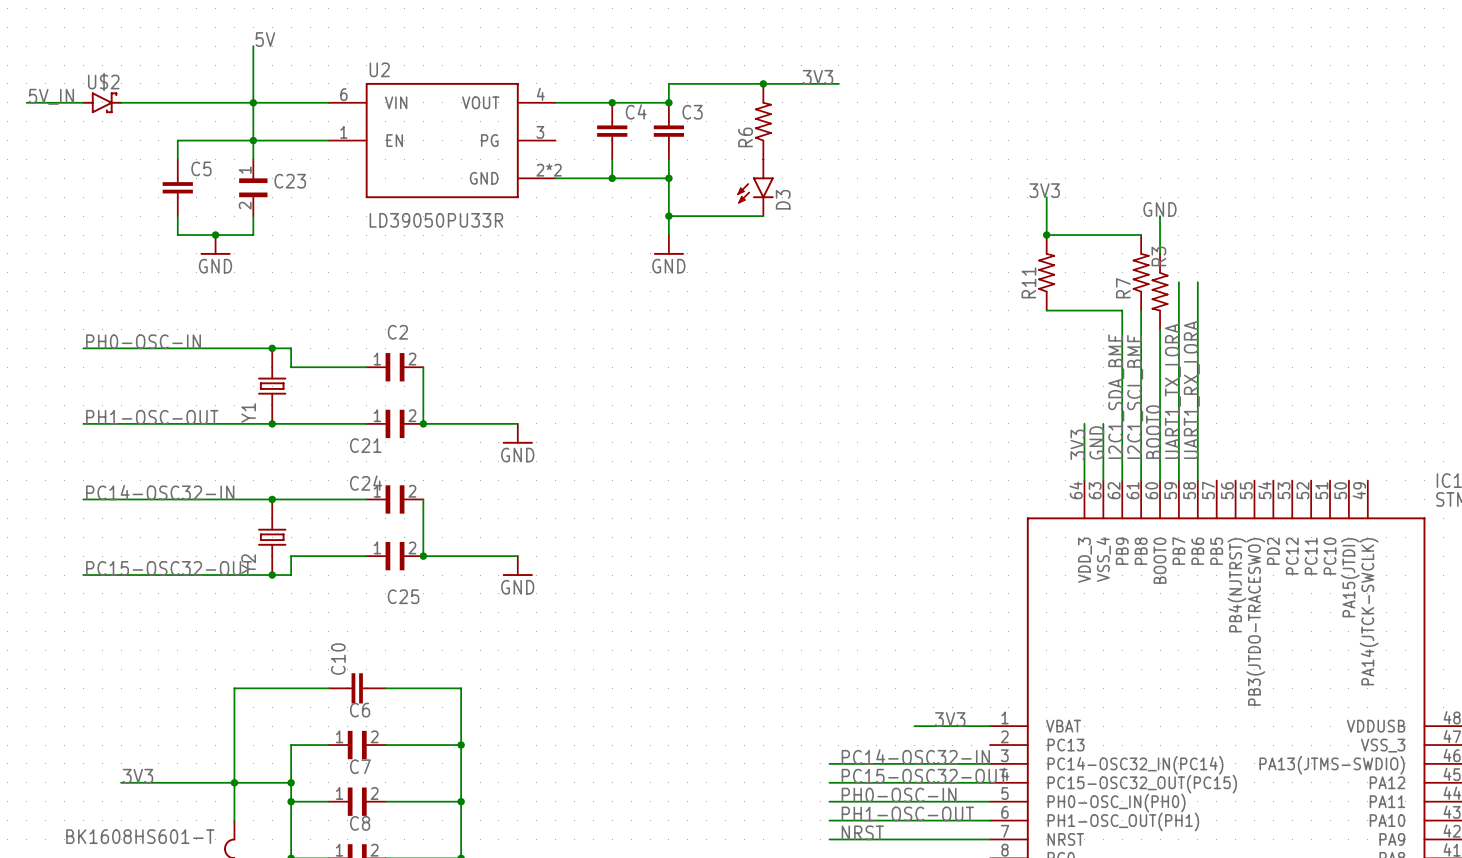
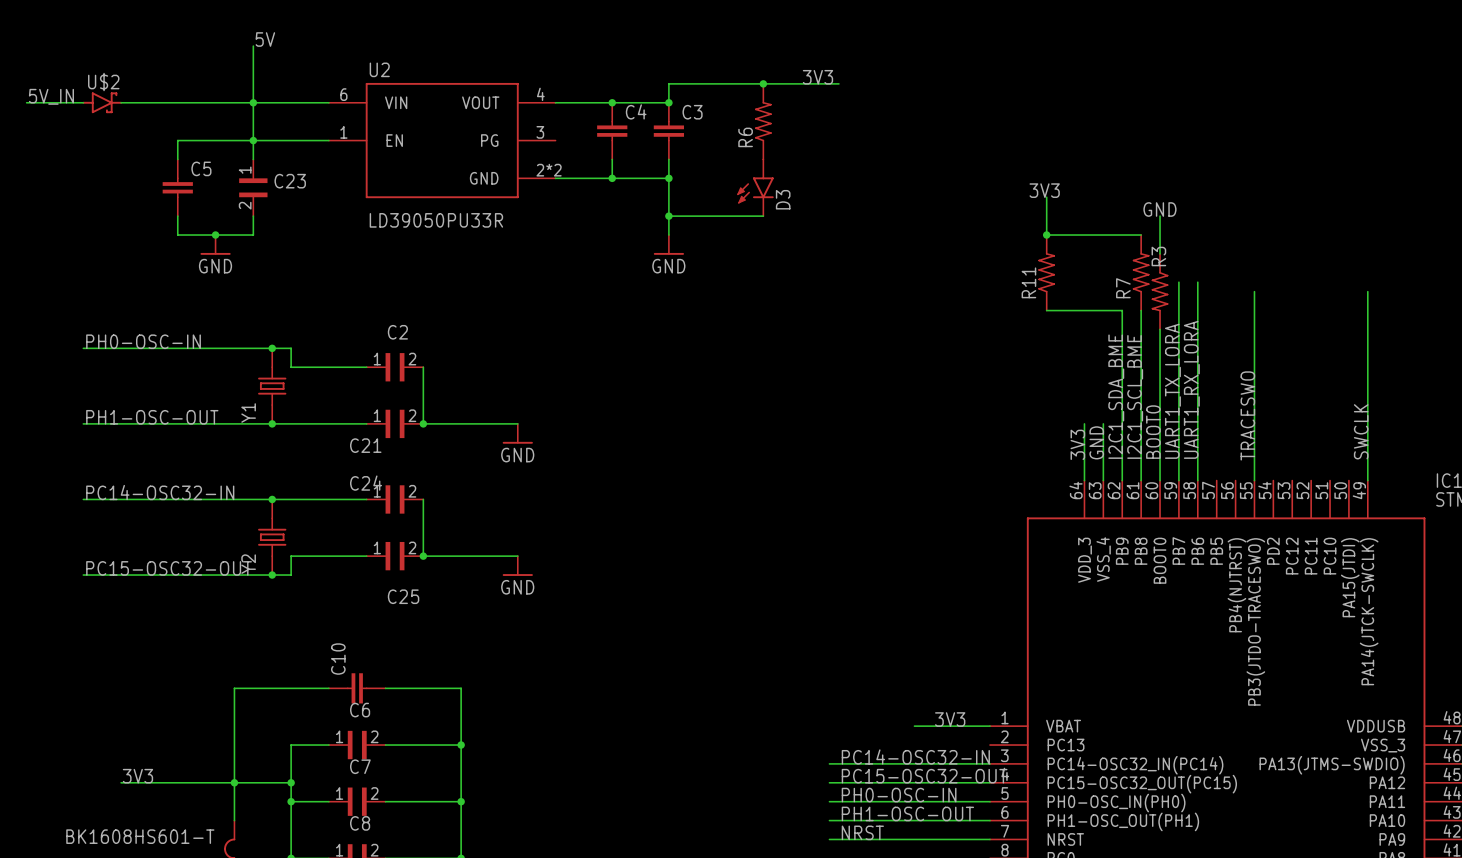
wire: none -> (1254, 291) (1254, 480)
wire: none -> (1367, 291) (1367, 480)
label: none -> TRACESWO (1247, 415)
label: none -> SWCLK (1361, 431)

